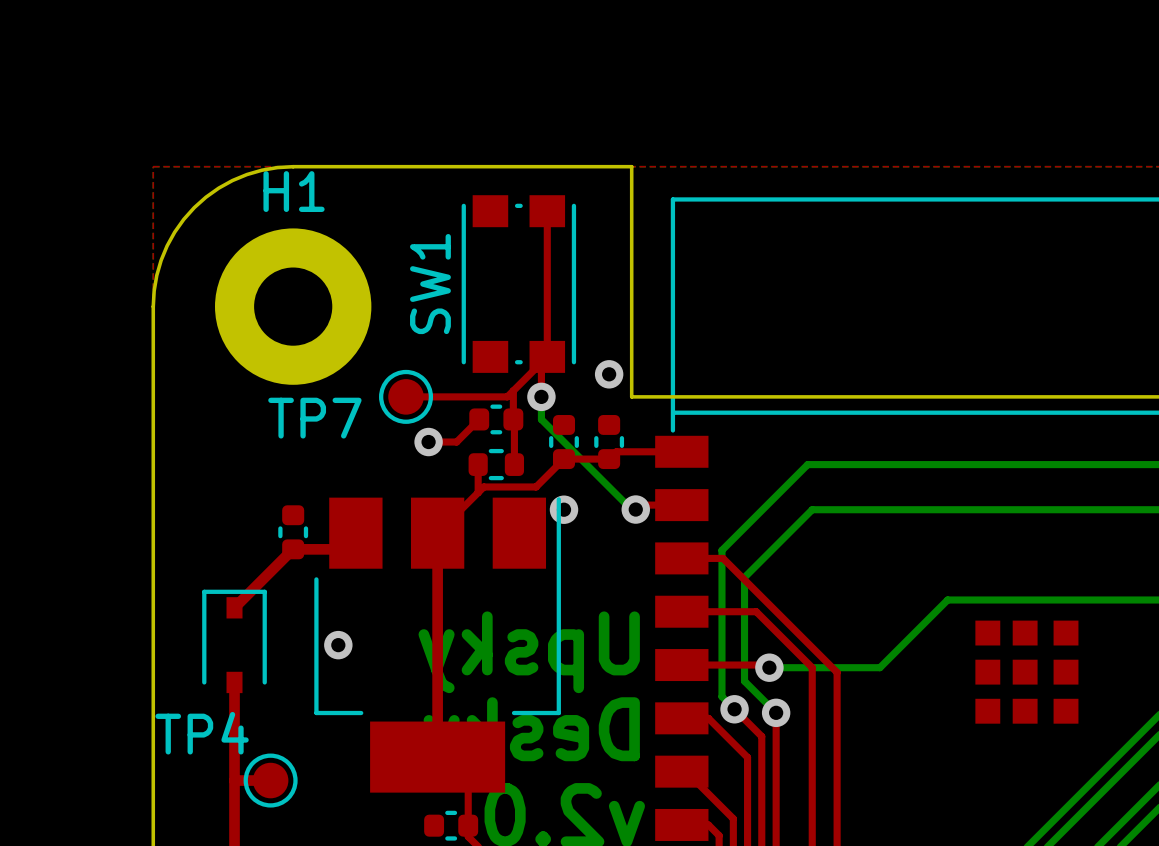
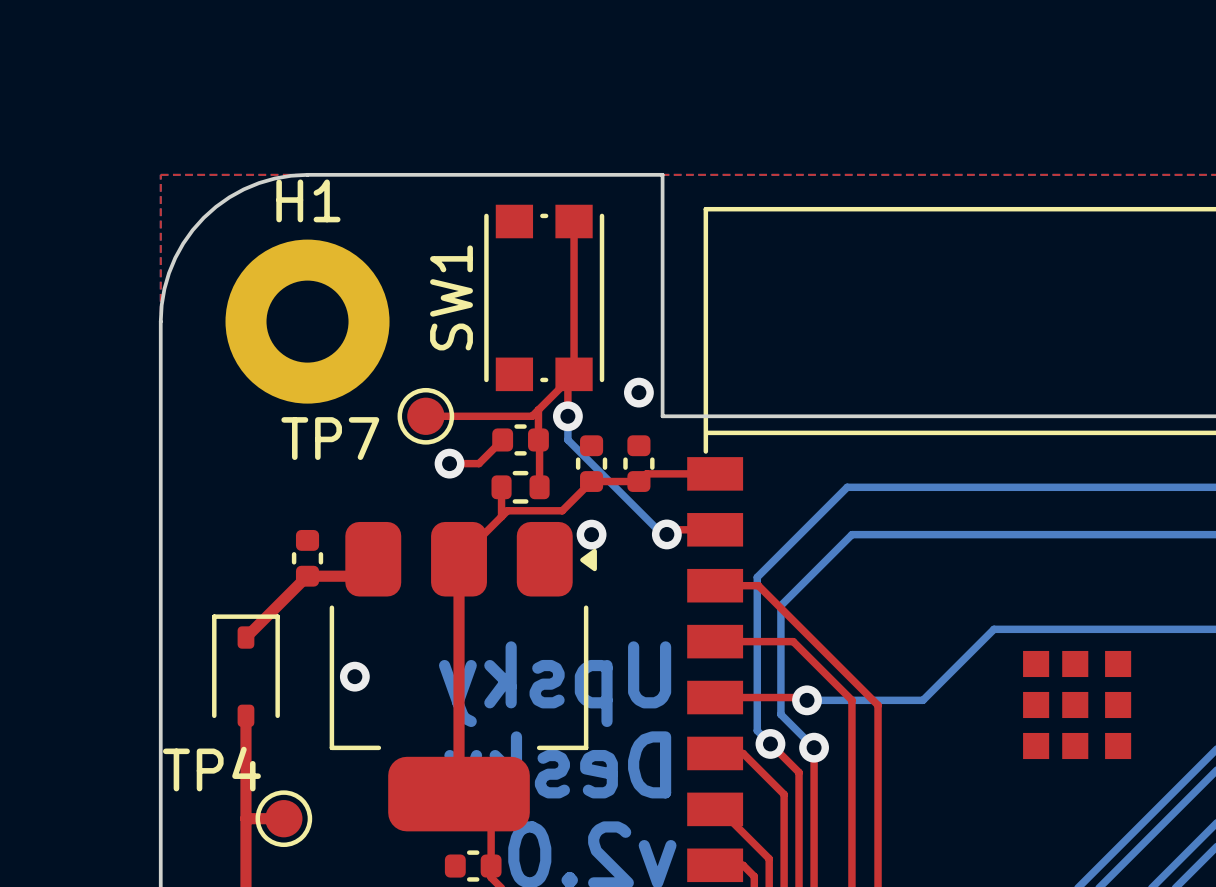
part footprint: [314, 497, 561, 793] -> [329, 521, 597, 832]
part footprint: [202, 589, 267, 694] -> [212, 614, 280, 727]

